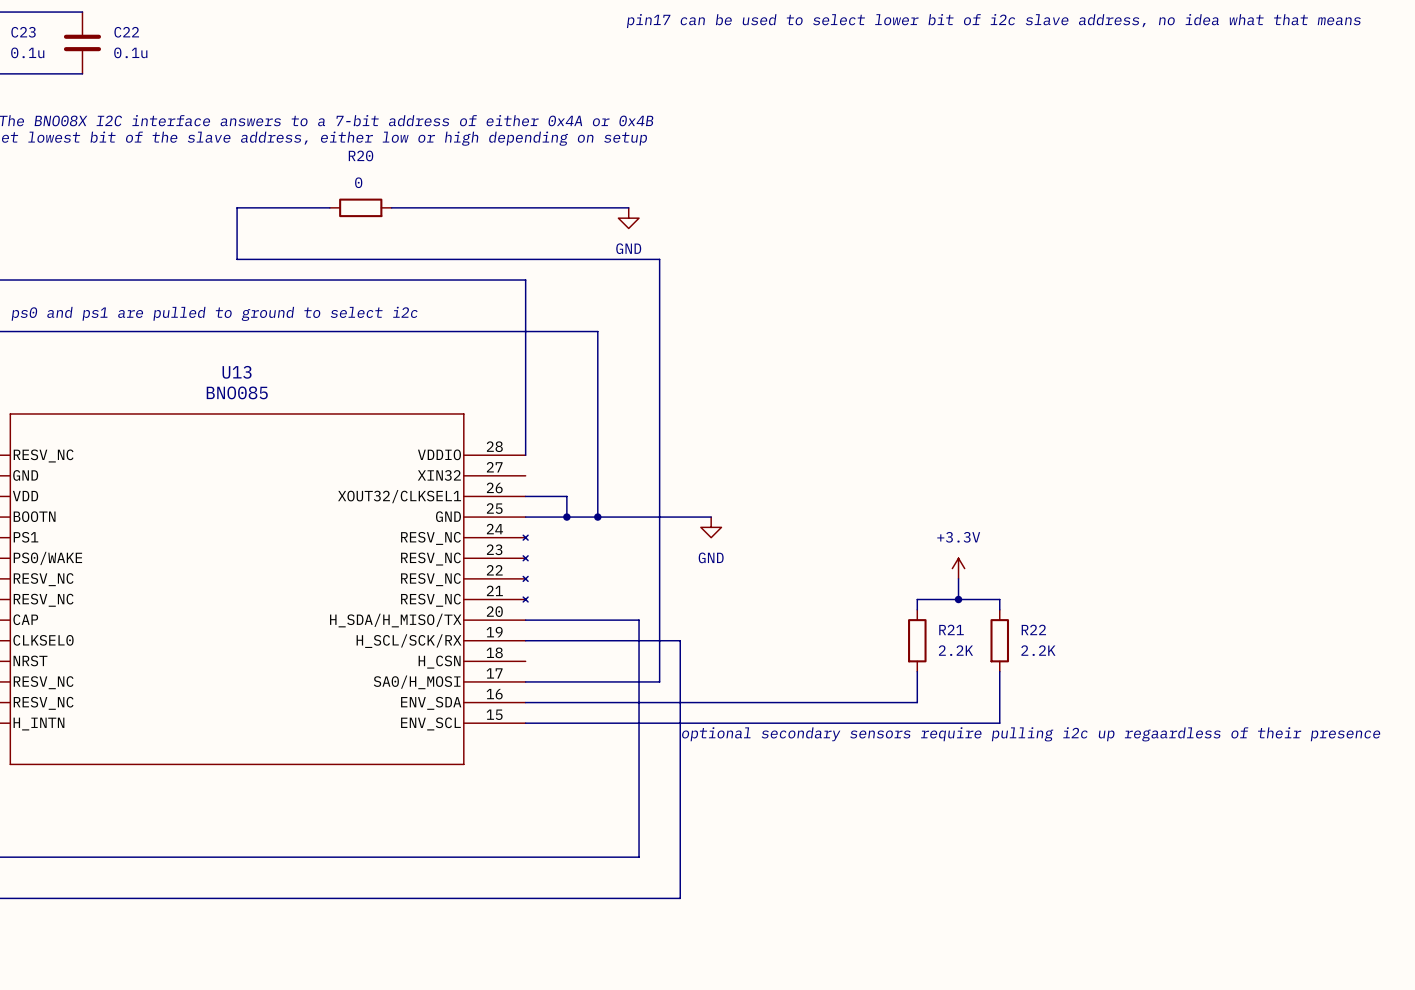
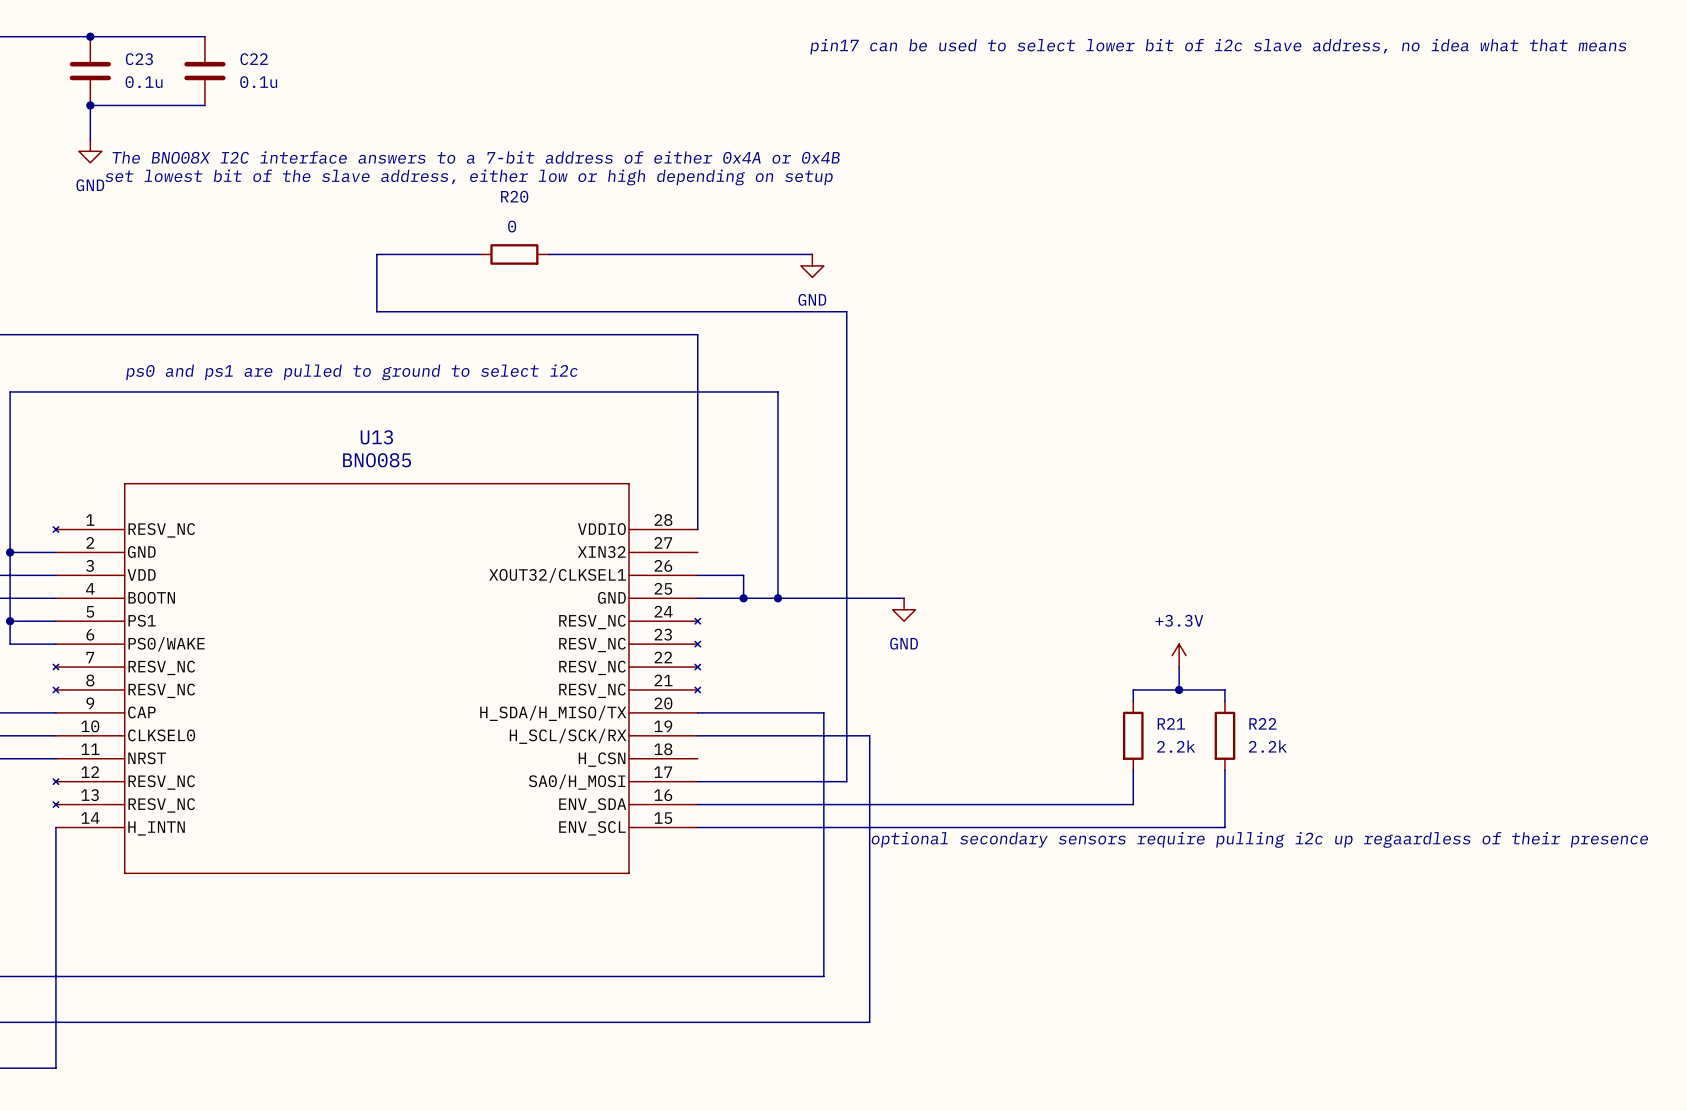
R21 value: 2.2K (955, 650) -> 2.2k (1176, 746)
R22 value: 2.2K (1038, 650) -> 2.2k (1267, 746)

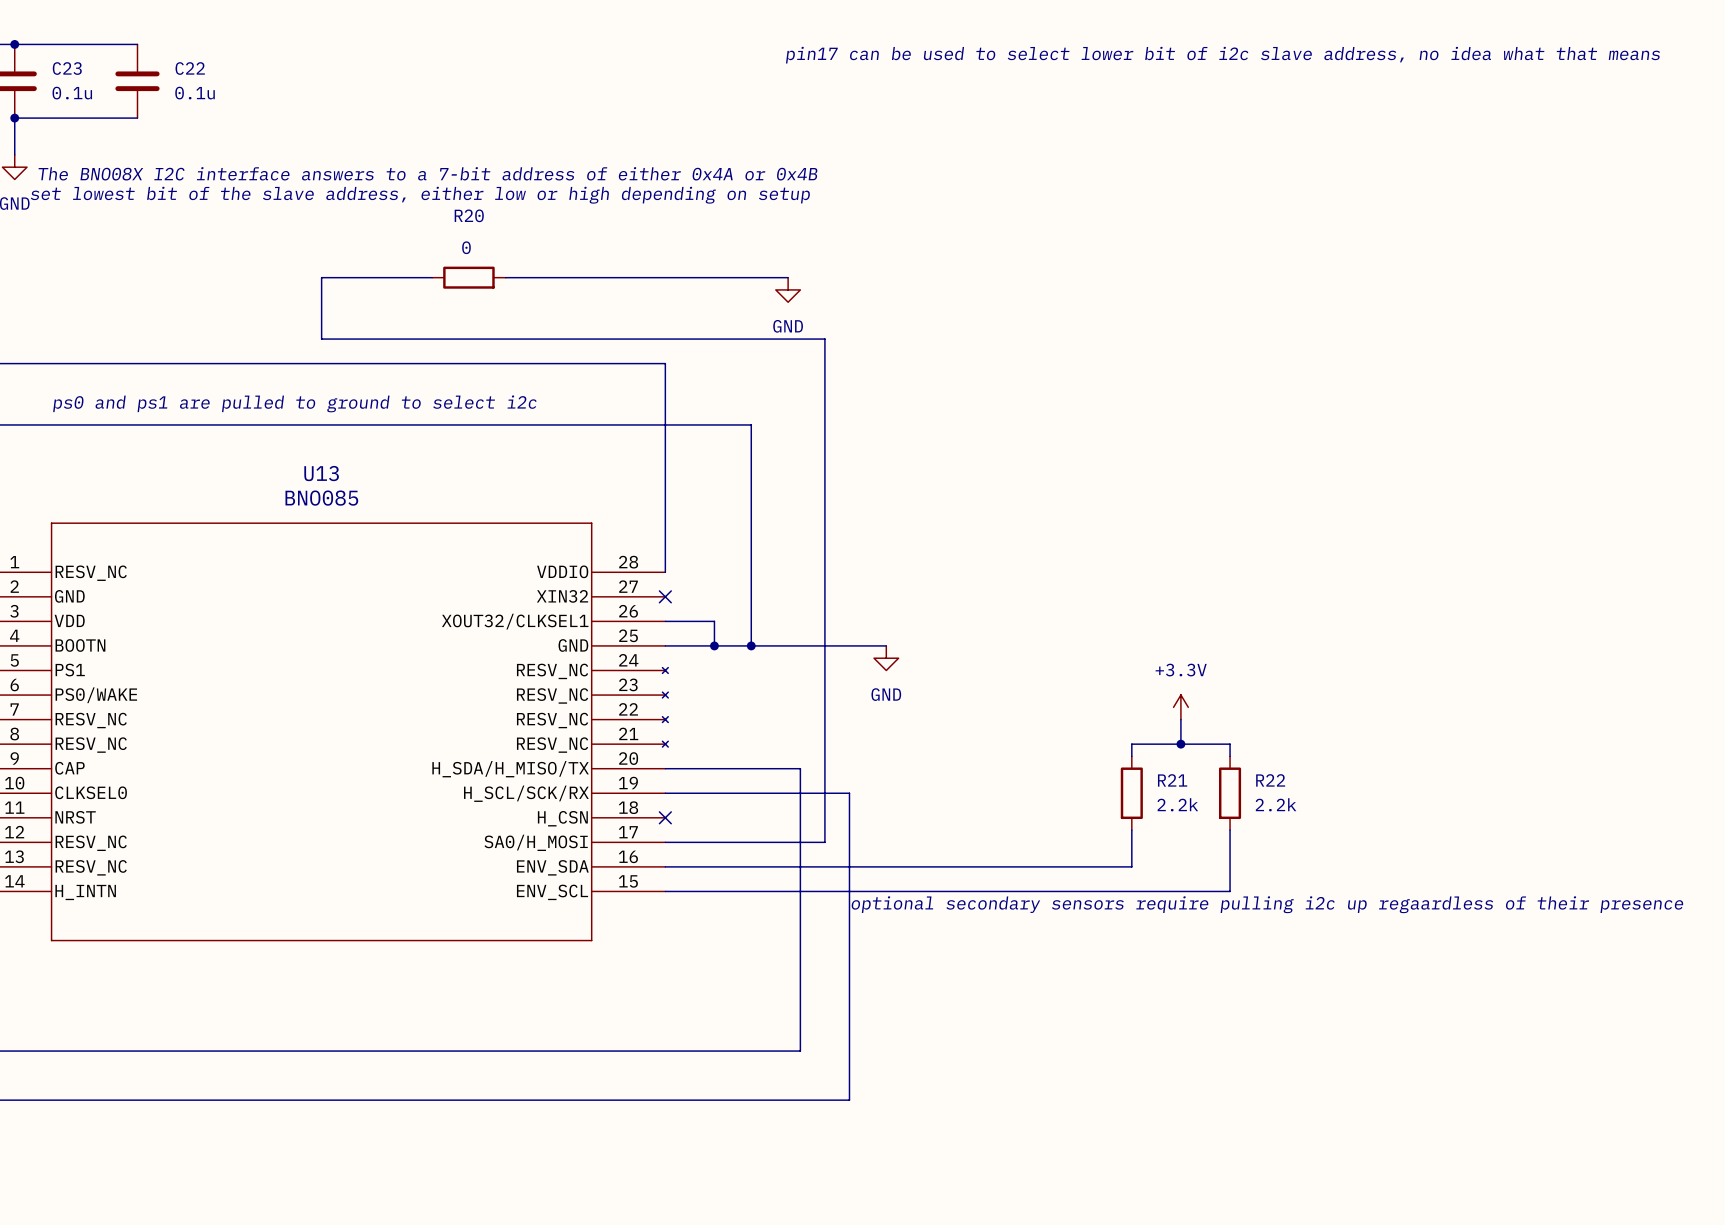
no-connect mark: none -> (665, 596)
no-connect mark: none -> (665, 817)

